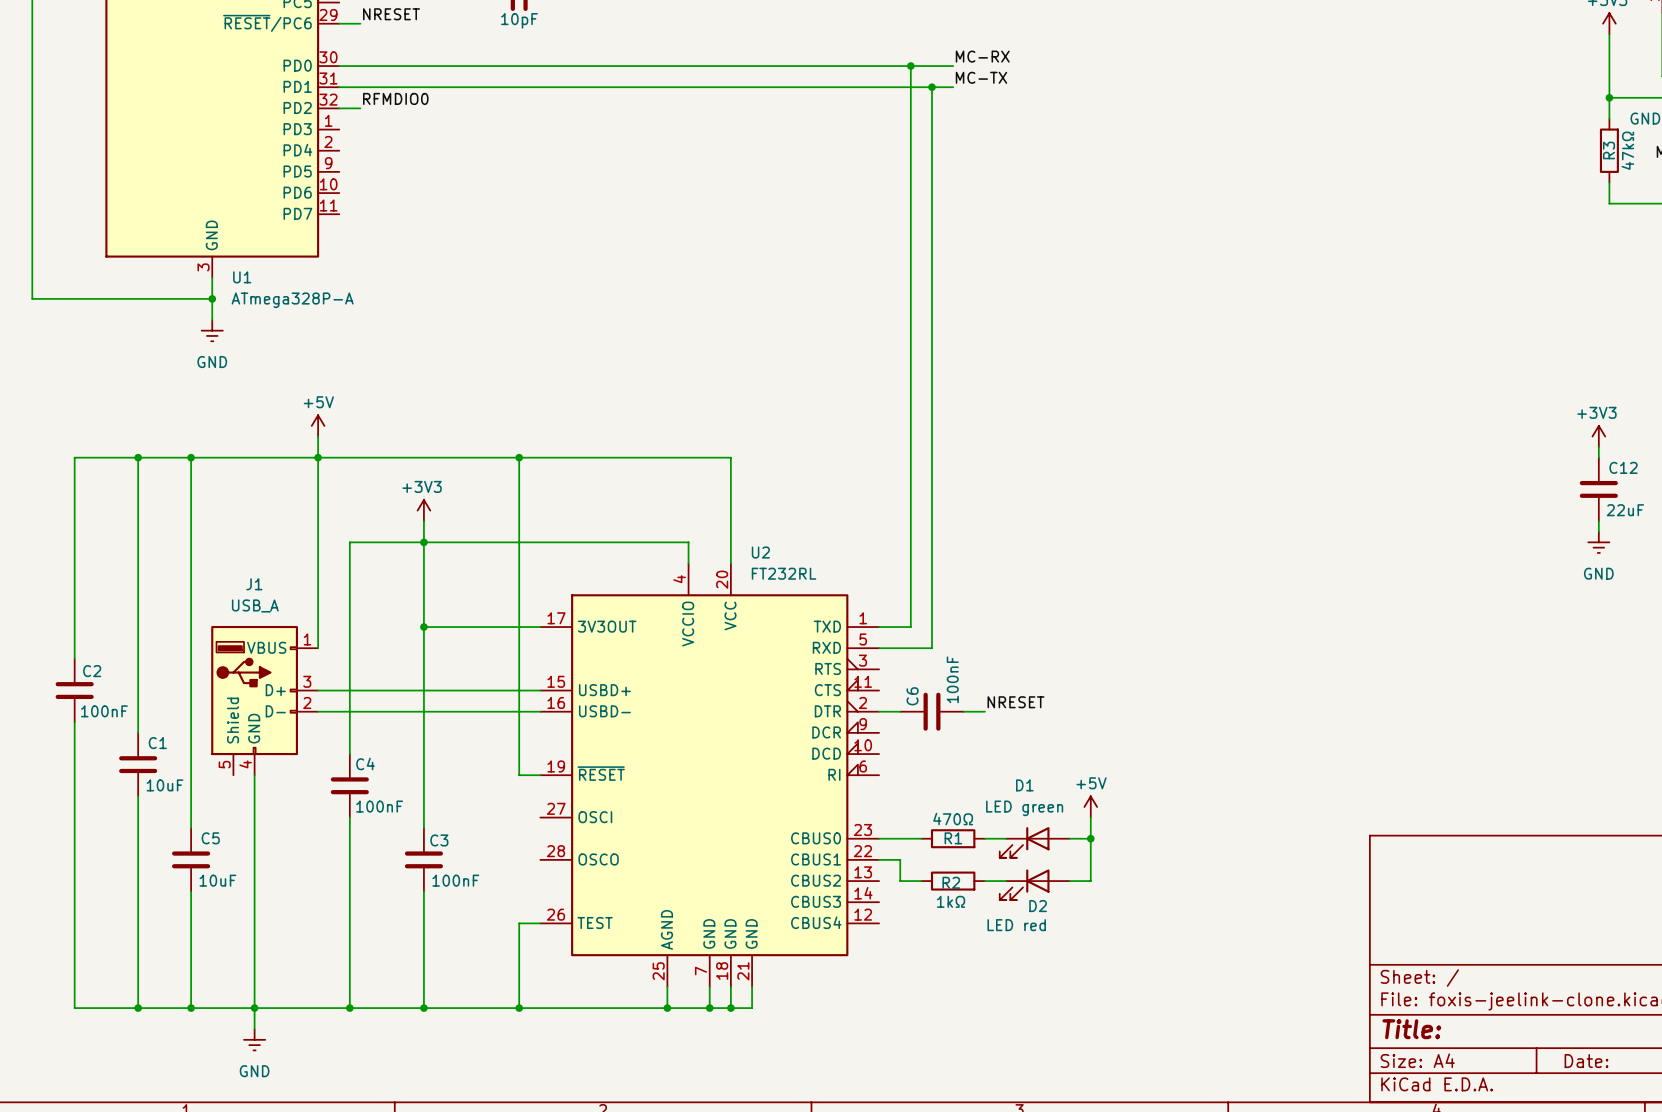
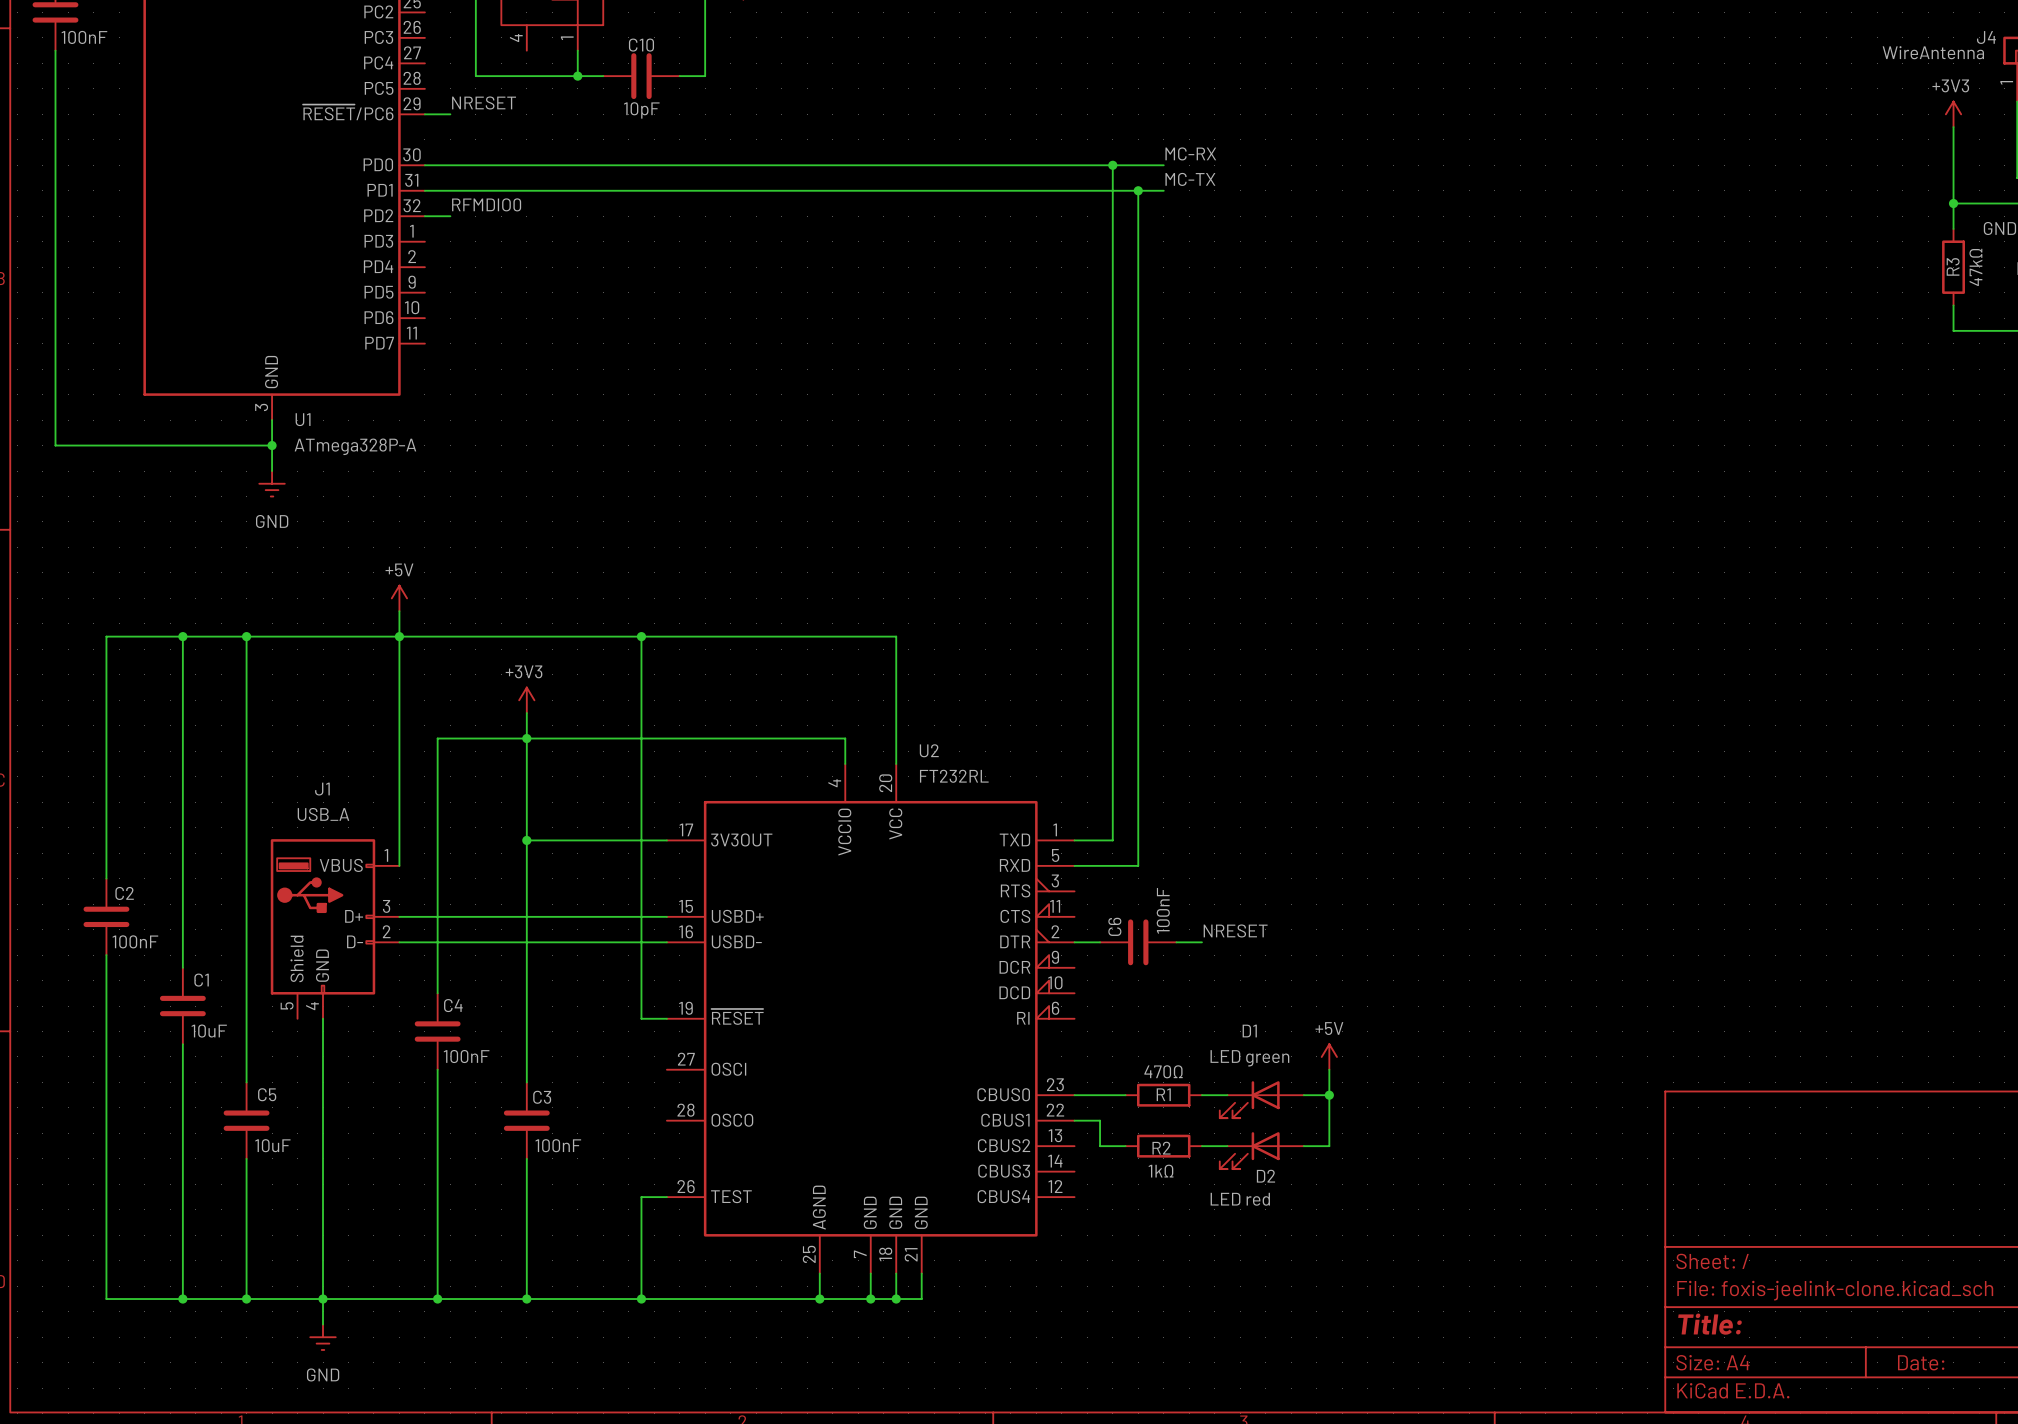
power symbol: +3V3 (1598, 436) -> none
wire: (1598, 447) (1598, 457) -> none
C12: 22uF (1598, 489) -> none
wire: (1598, 521) (1598, 531) -> none
power symbol: GND (1598, 542) -> none

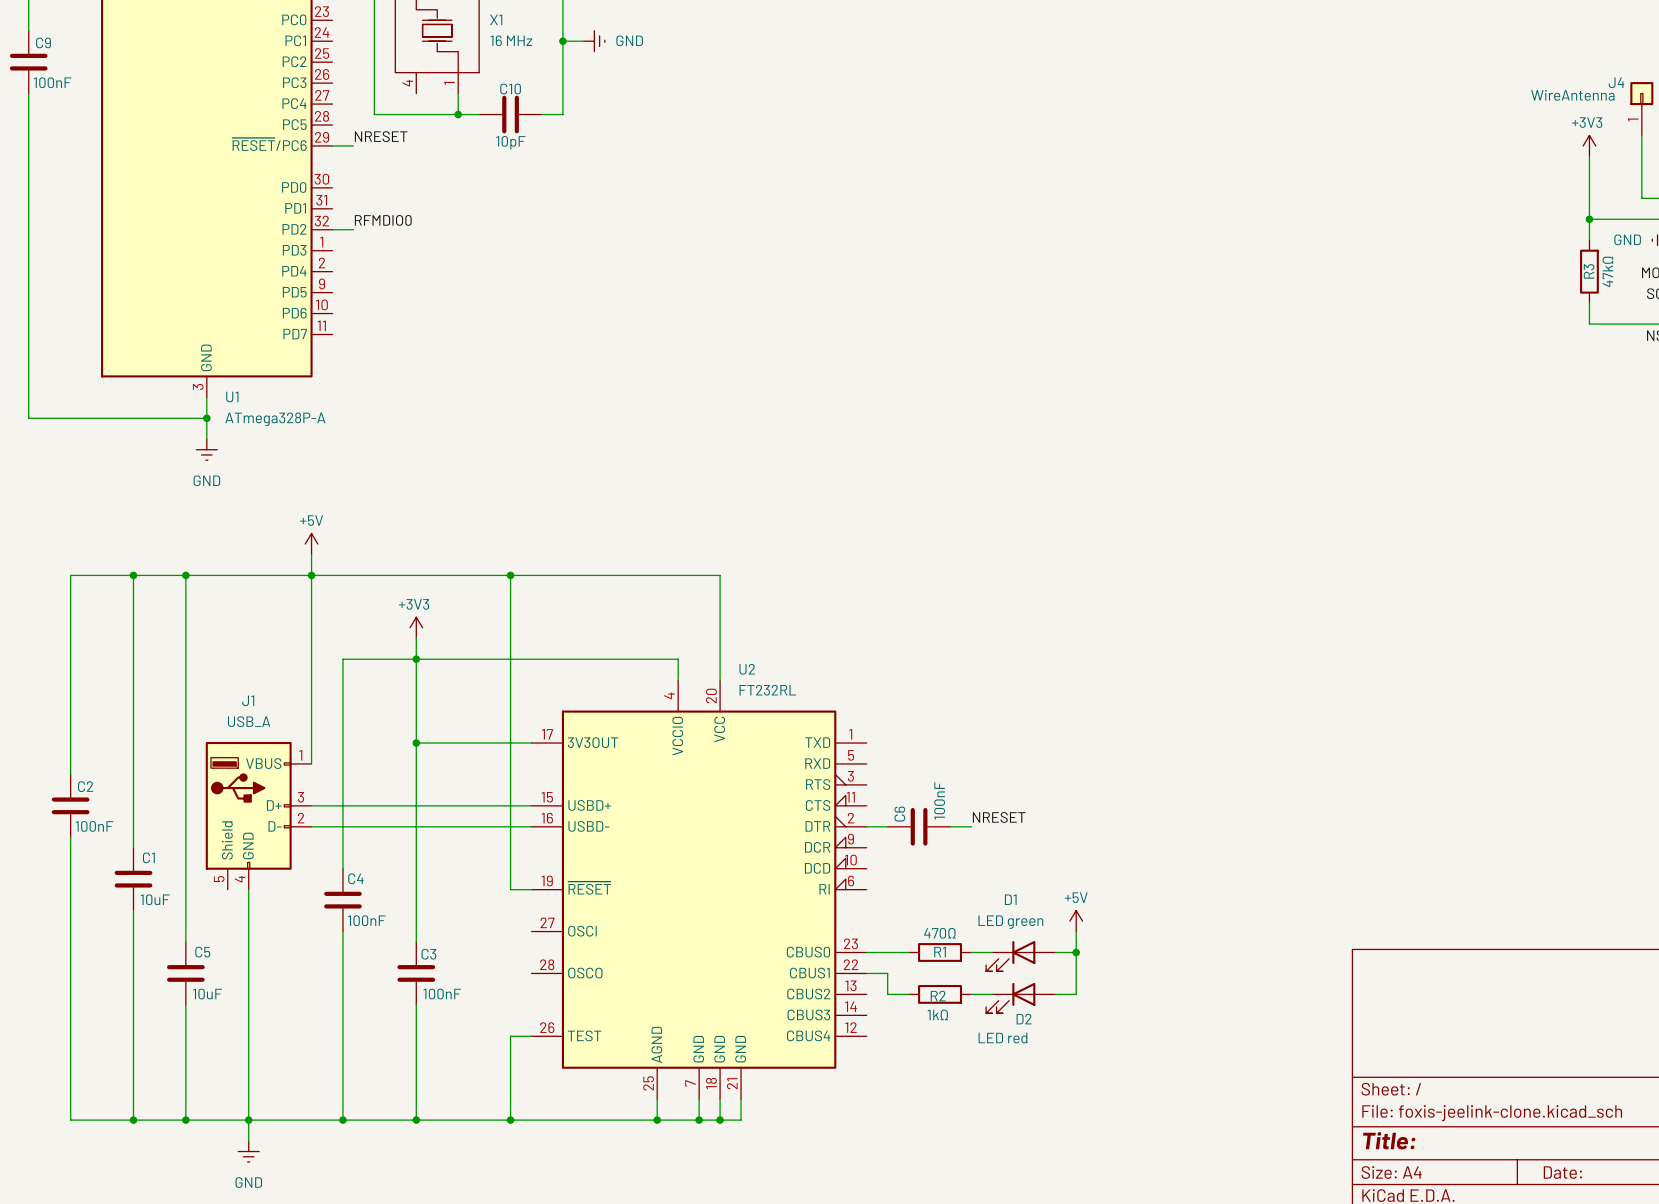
label: MC-RX (1190, 153) -> none
wire: (424, 165) (1163, 165) -> none
wire: (1112, 165) (1112, 840) (1074, 840) -> none
junction: (1112, 165) -> none
label: MC-TX (1190, 179) -> none
wire: (424, 190) (1163, 190) -> none
wire: (1138, 190) (1138, 865) (1074, 865) -> none
junction: (1138, 190) -> none

